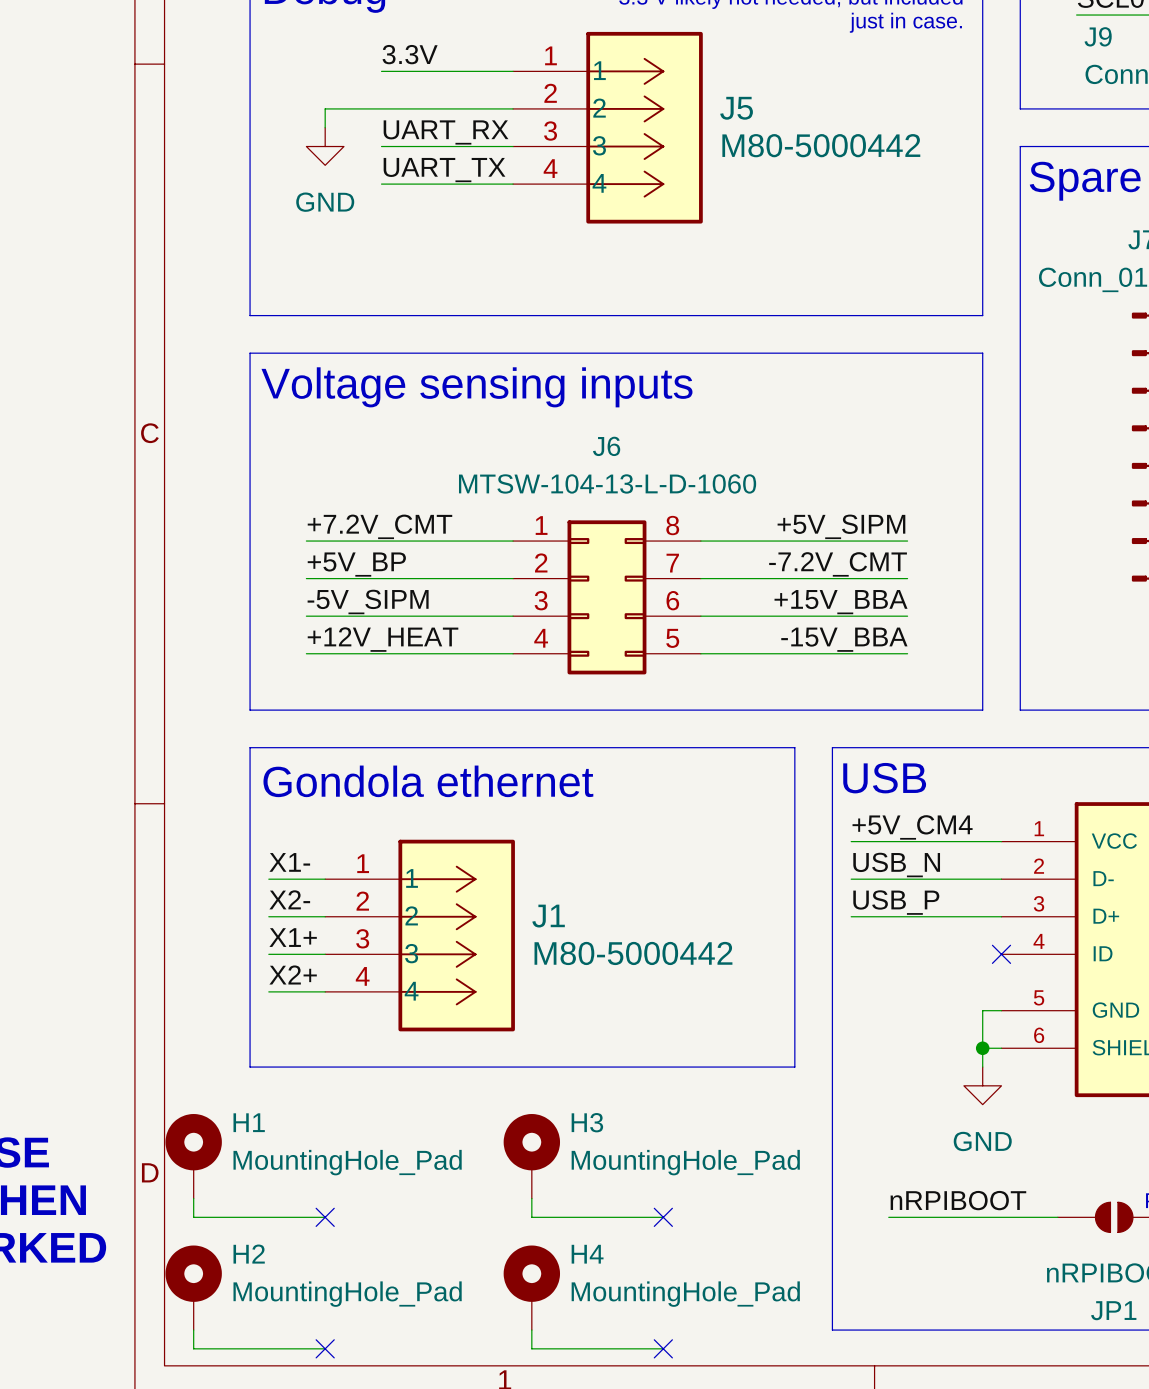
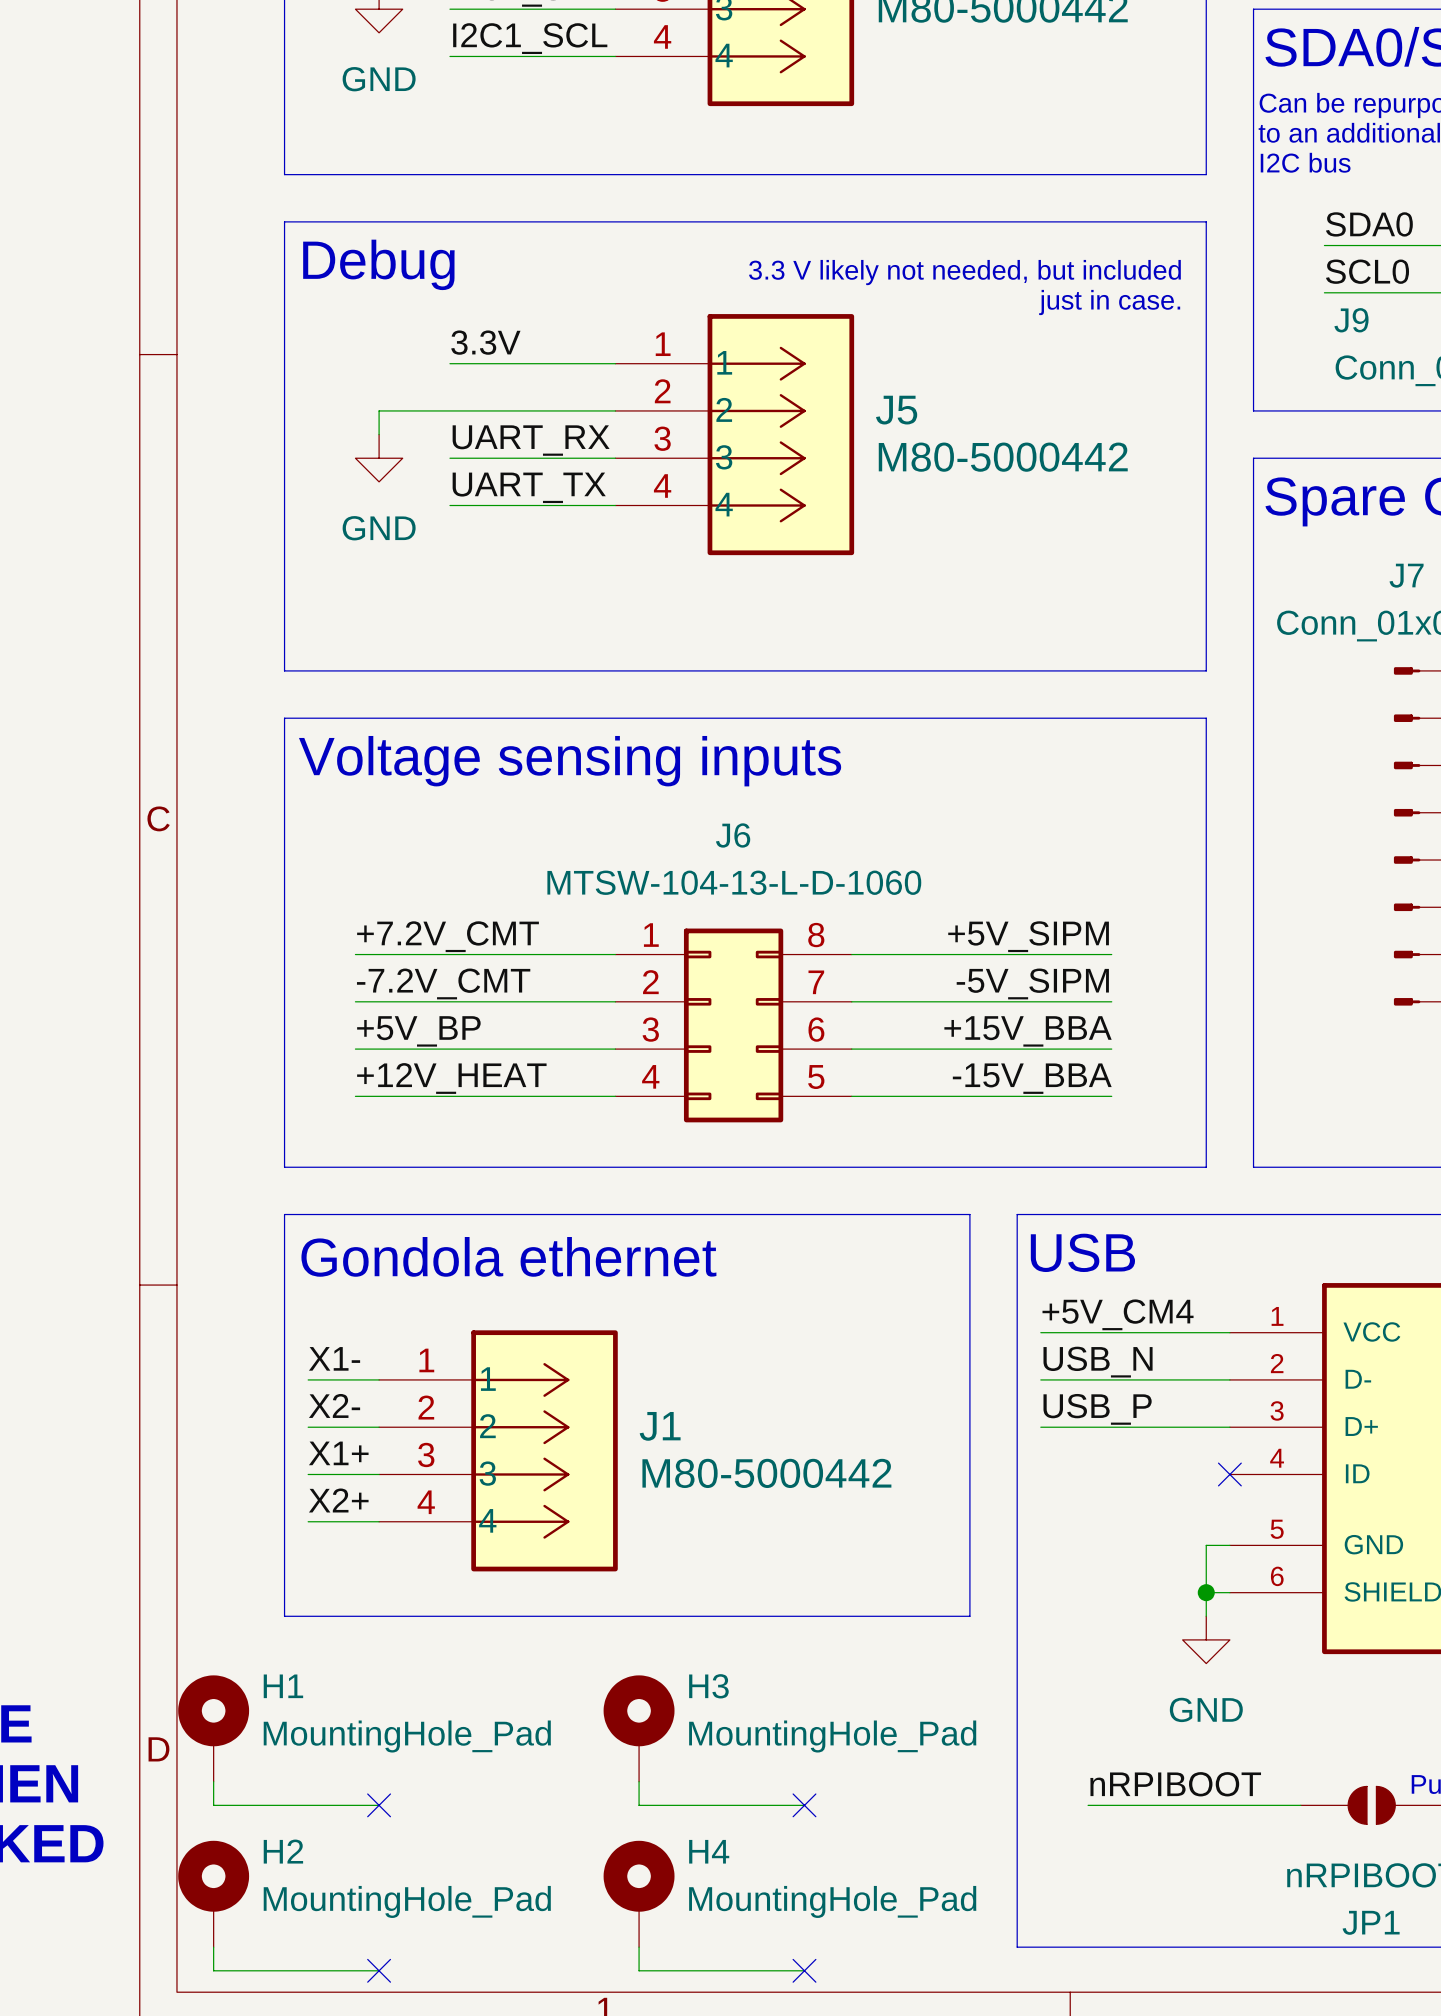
label: +5V_BP (356, 564) -> -7.2V_CMT (443, 983)
label: -7.2V_CMT (838, 564) -> -5V_SIPM (1032, 983)
label: -5V_SIPM (368, 601) -> +5V_BP (418, 1031)

